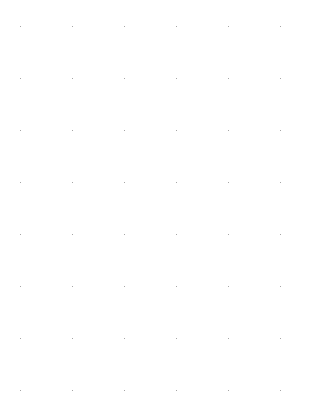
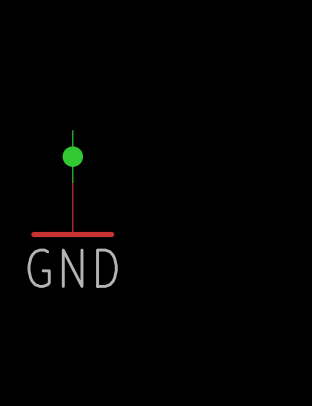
wire: none -> (72, 130) (72, 182)
junction: none -> (72, 156)
power symbol: none -> GND (72, 209)

